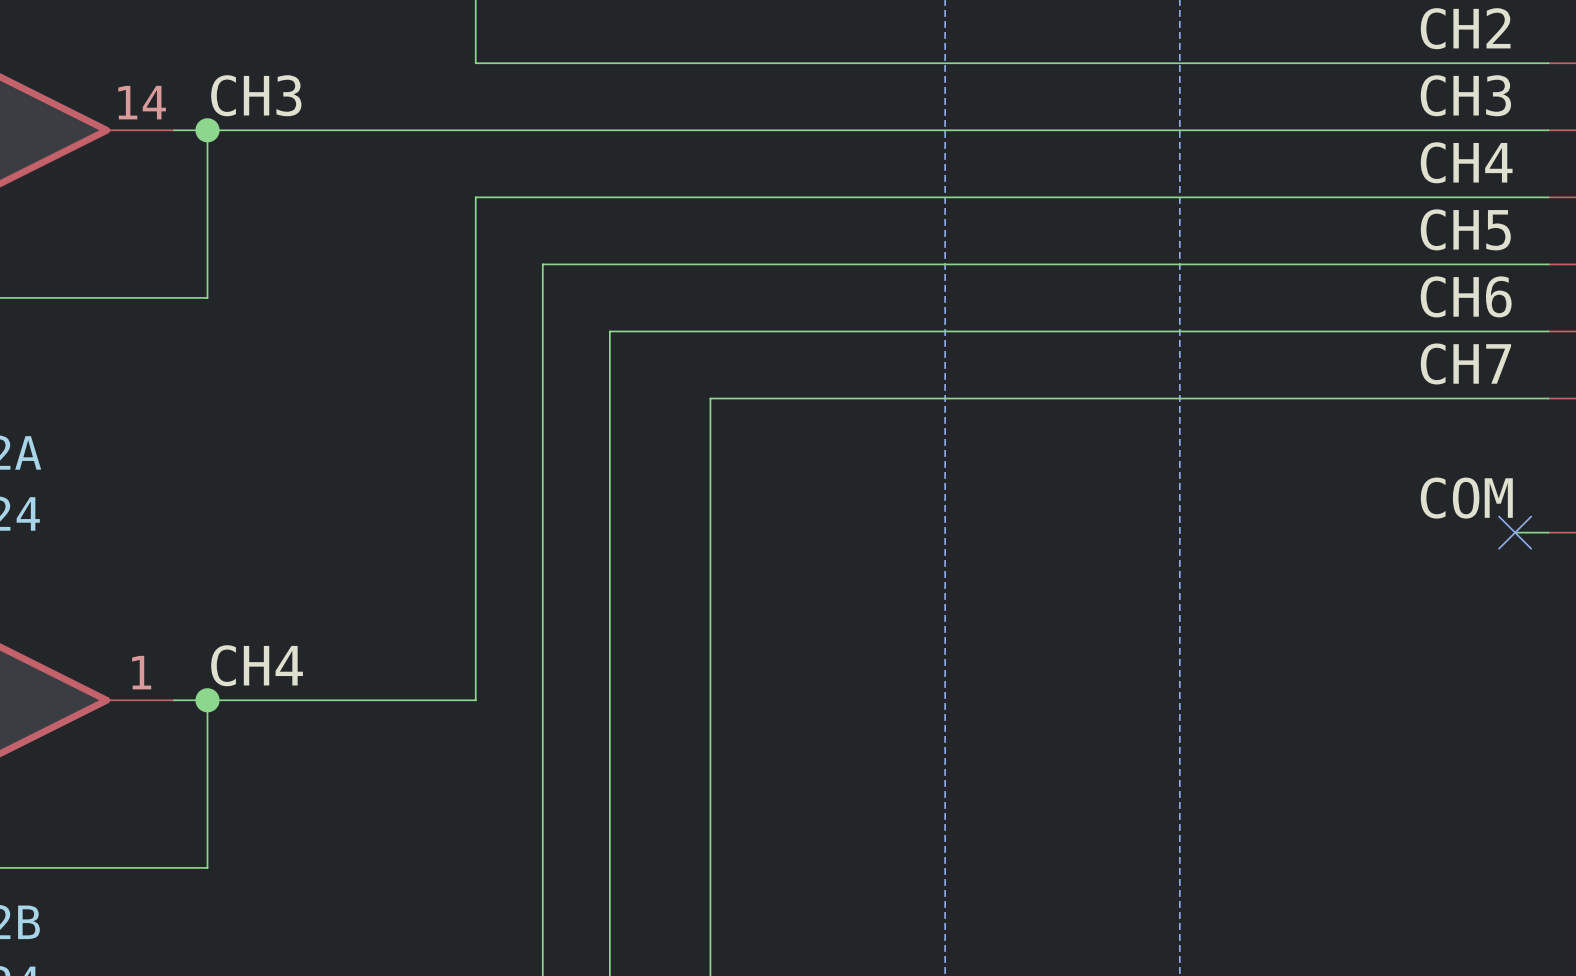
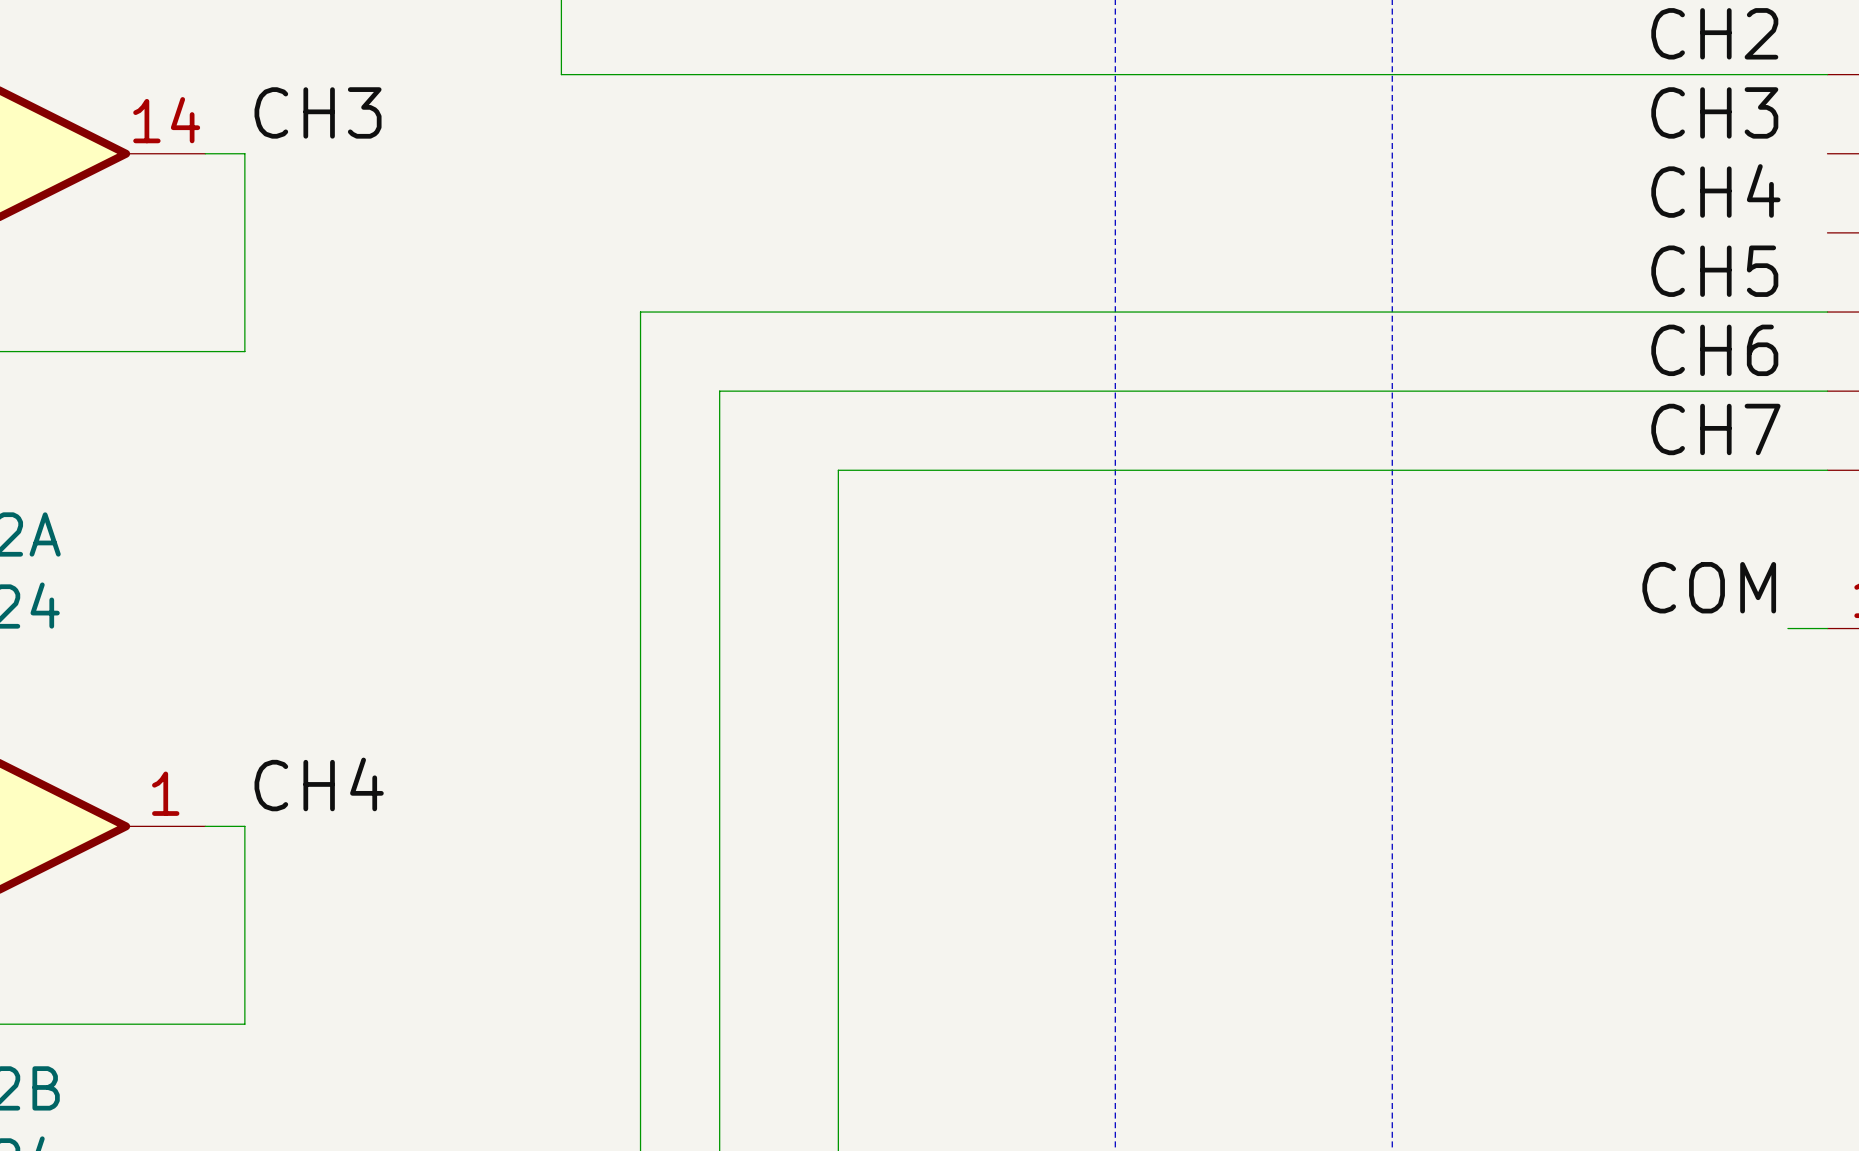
wire: (207, 130) (1548, 130) -> none
junction: (207, 130) -> none
wire: (1548, 197) (475, 197) (475, 700) (207, 700) -> none
no-connect mark: (1515, 532) -> none
junction: (207, 700) -> none

